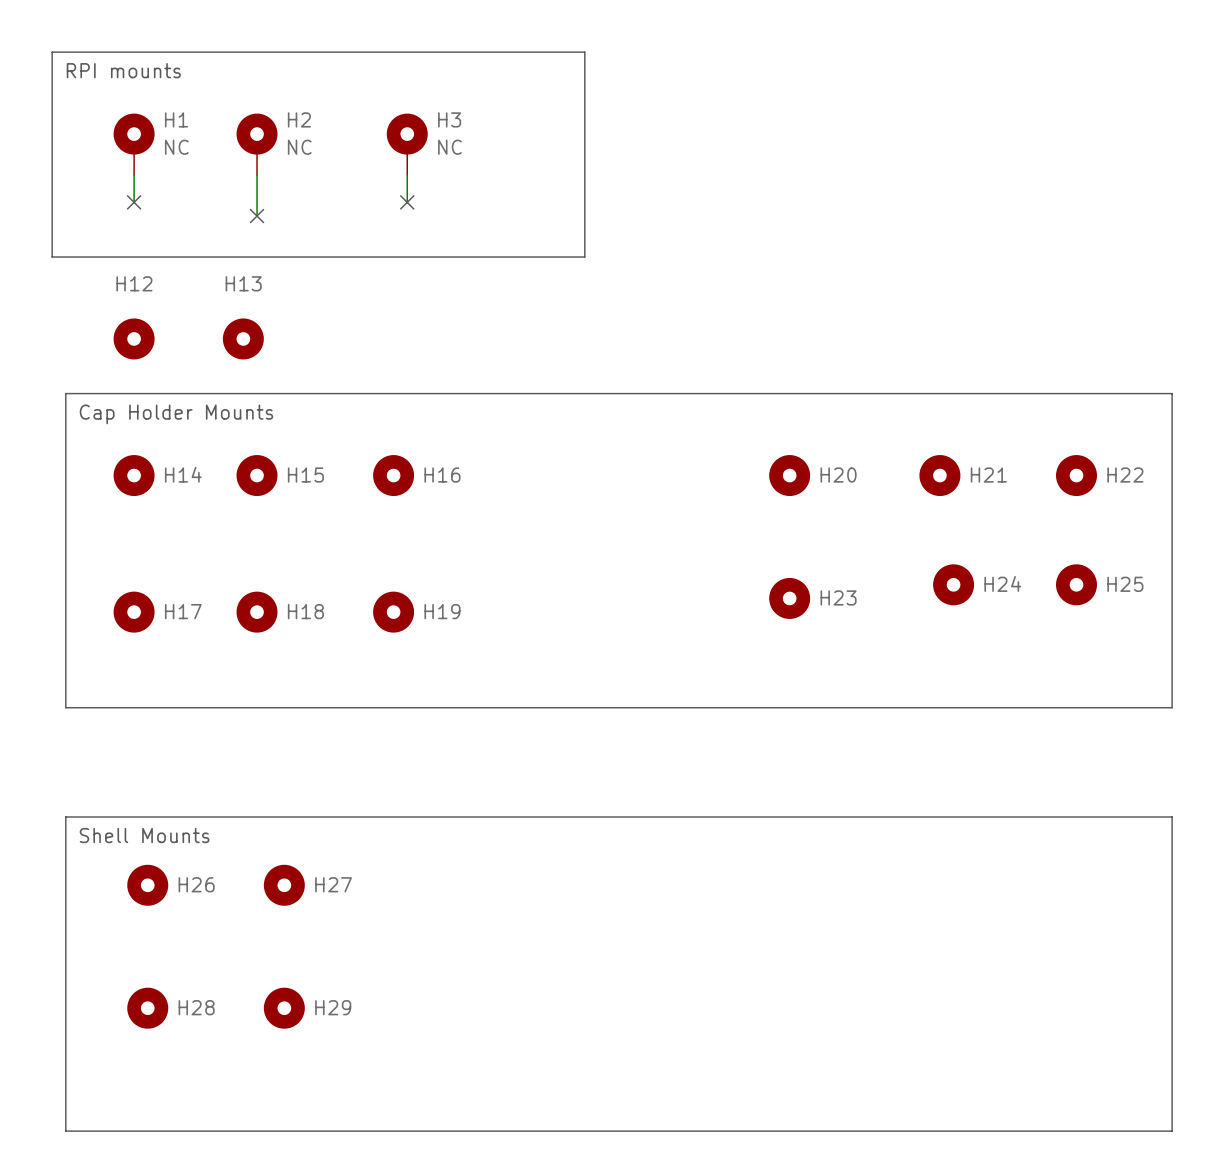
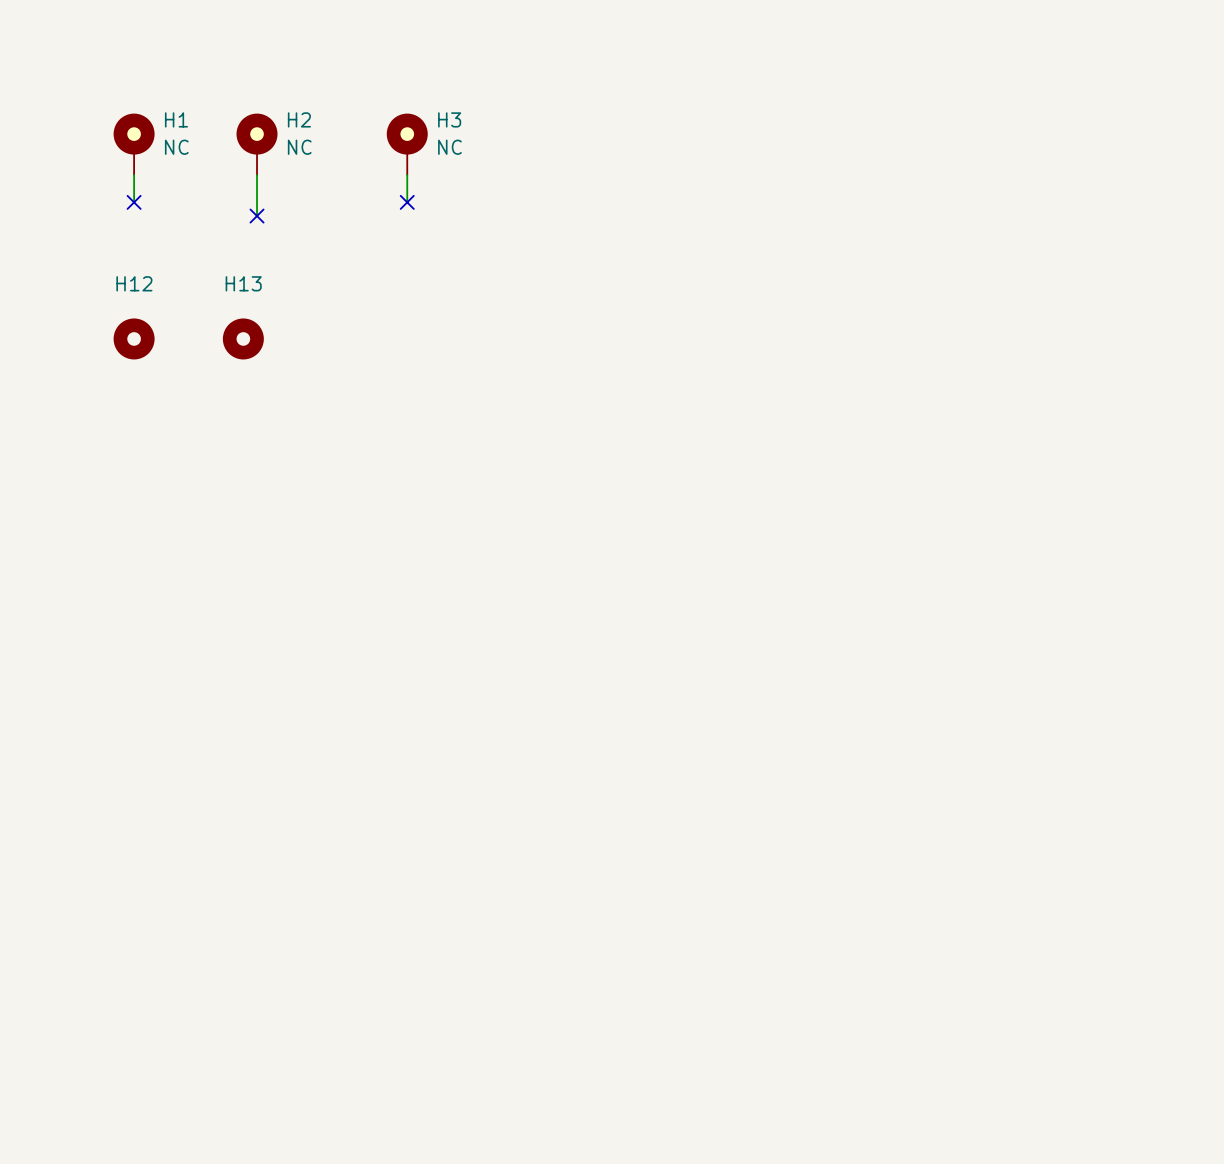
line: (52, 52) (584, 52) (584, 257) (52, 257) (52, 52) -> none
text: RPI mounts (123, 70) -> none
line: (65, 393) (1172, 393) (1172, 707) (65, 707) (65, 393) -> none
text: Cap Holder Mounts (176, 414) -> none
H14: (134, 475) -> none
H15: (257, 475) -> none
H16: (393, 475) -> none
H20: (789, 475) -> none
H21: (939, 475) -> none
H22: (1076, 475) -> none
H24: (953, 584) -> none
H25: (1076, 584) -> none
H23: (789, 598) -> none
H17: (134, 612) -> none
H18: (257, 612) -> none
H19: (393, 612) -> none
line: (65, 816) (65, 1131) (1172, 1131) (1172, 816) (65, 816) -> none
text: Shell Mounts (144, 835) -> none
H26: (147, 885) -> none
H27: (284, 885) -> none
H28: (147, 1008) -> none
H29: (284, 1008) -> none

